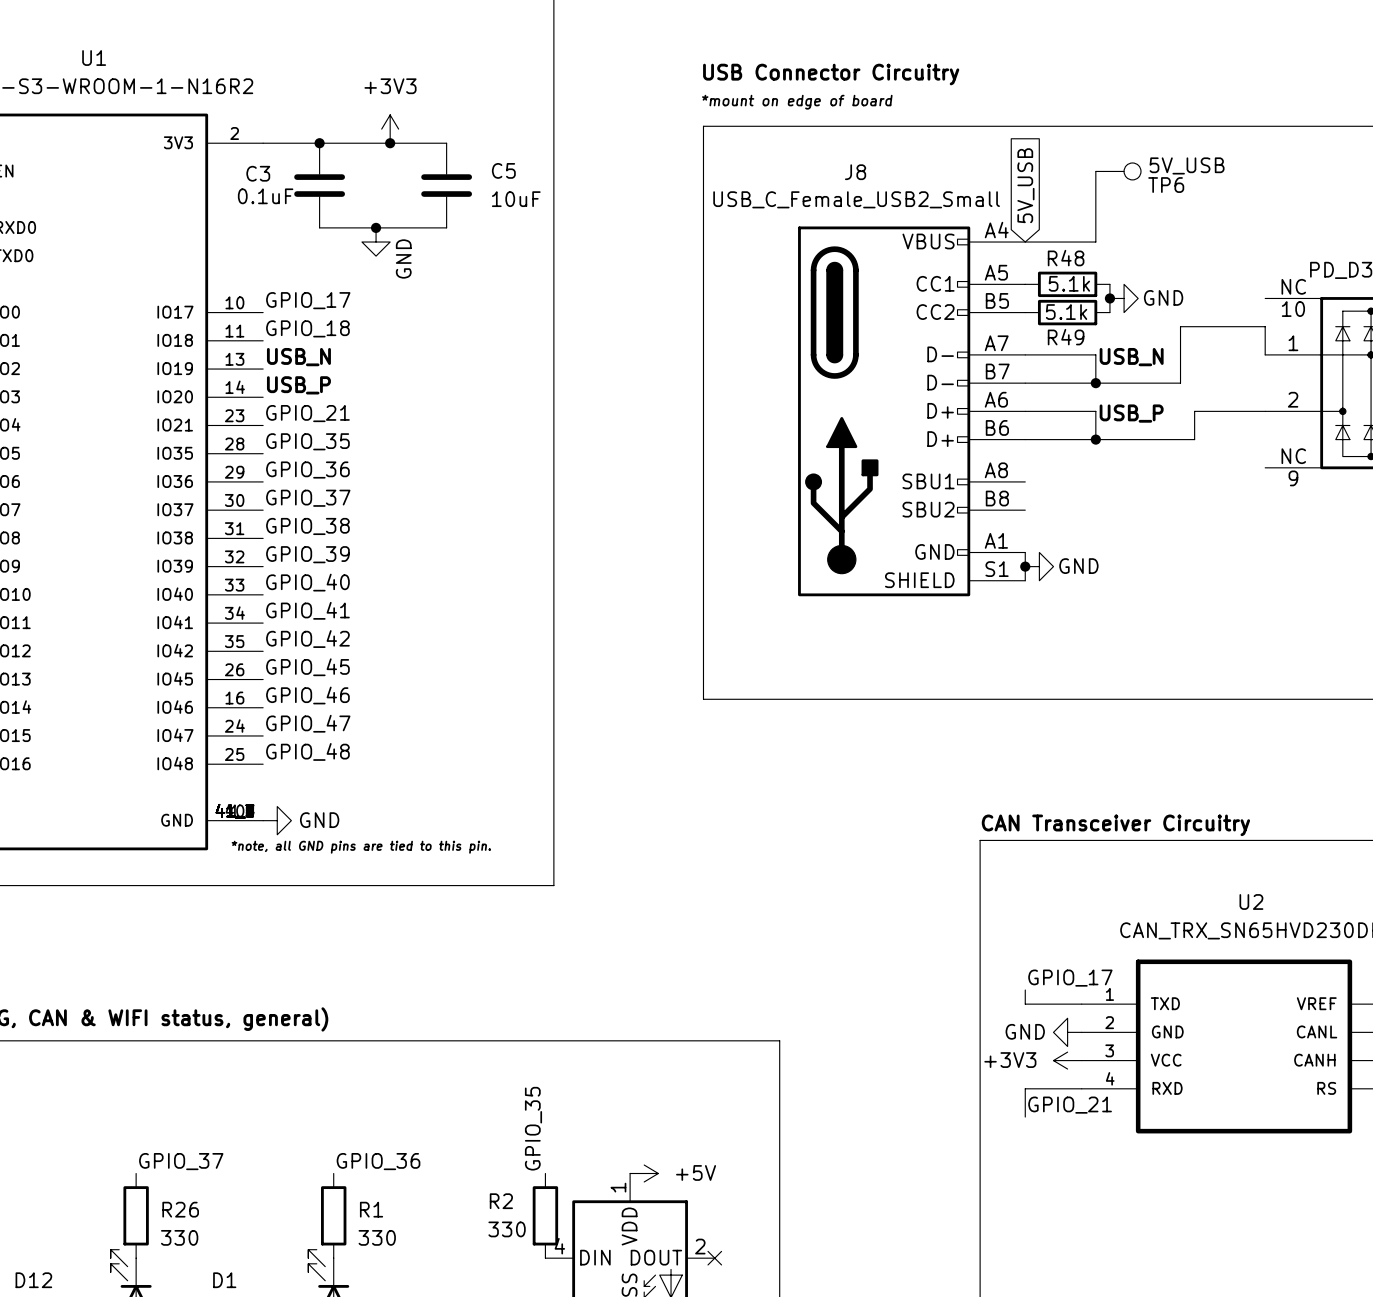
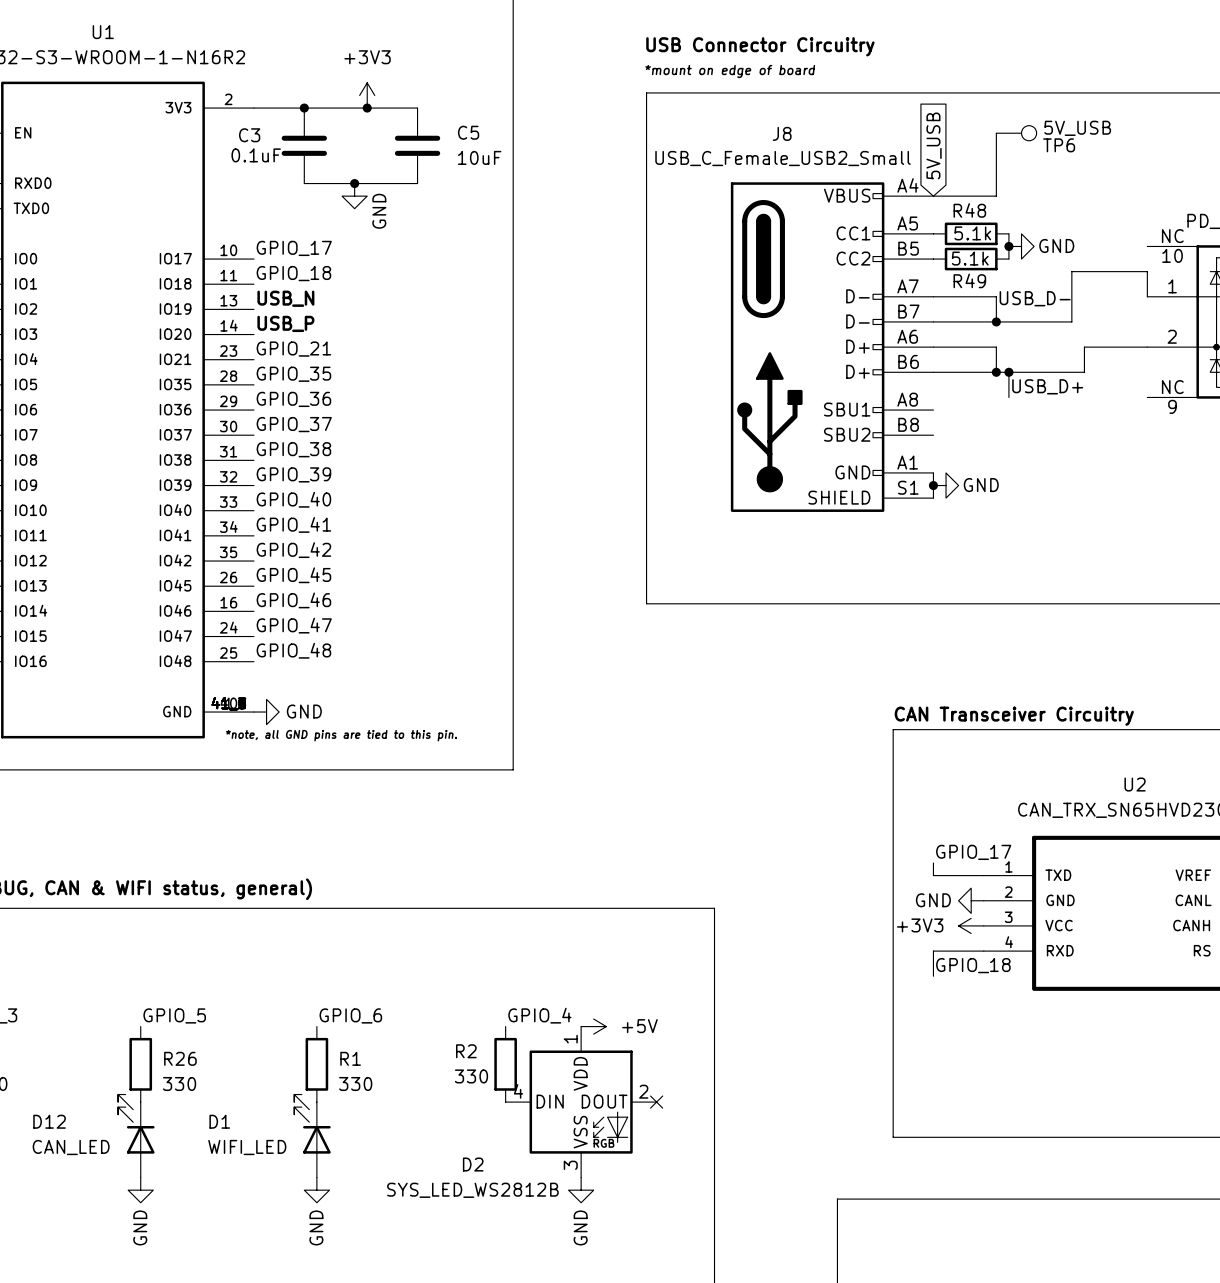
label: USB_N (1131, 357) -> USB_D- (1035, 298)
label: USB_P (1131, 413) -> none
wire: none -> (1008, 372) (1008, 397)
junction: none -> (1008, 372)
label: none -> USB_D+ (1047, 386)
label: GPIO_21 (1070, 1105) -> GPIO_18 (973, 965)
label: GPIO_35 (533, 1128) -> GPIO_4 (539, 1015)
label: GPIO_37 (181, 1161) -> GPIO_5 (174, 1015)
label: GPIO_36 (378, 1161) -> GPIO_6 (350, 1015)

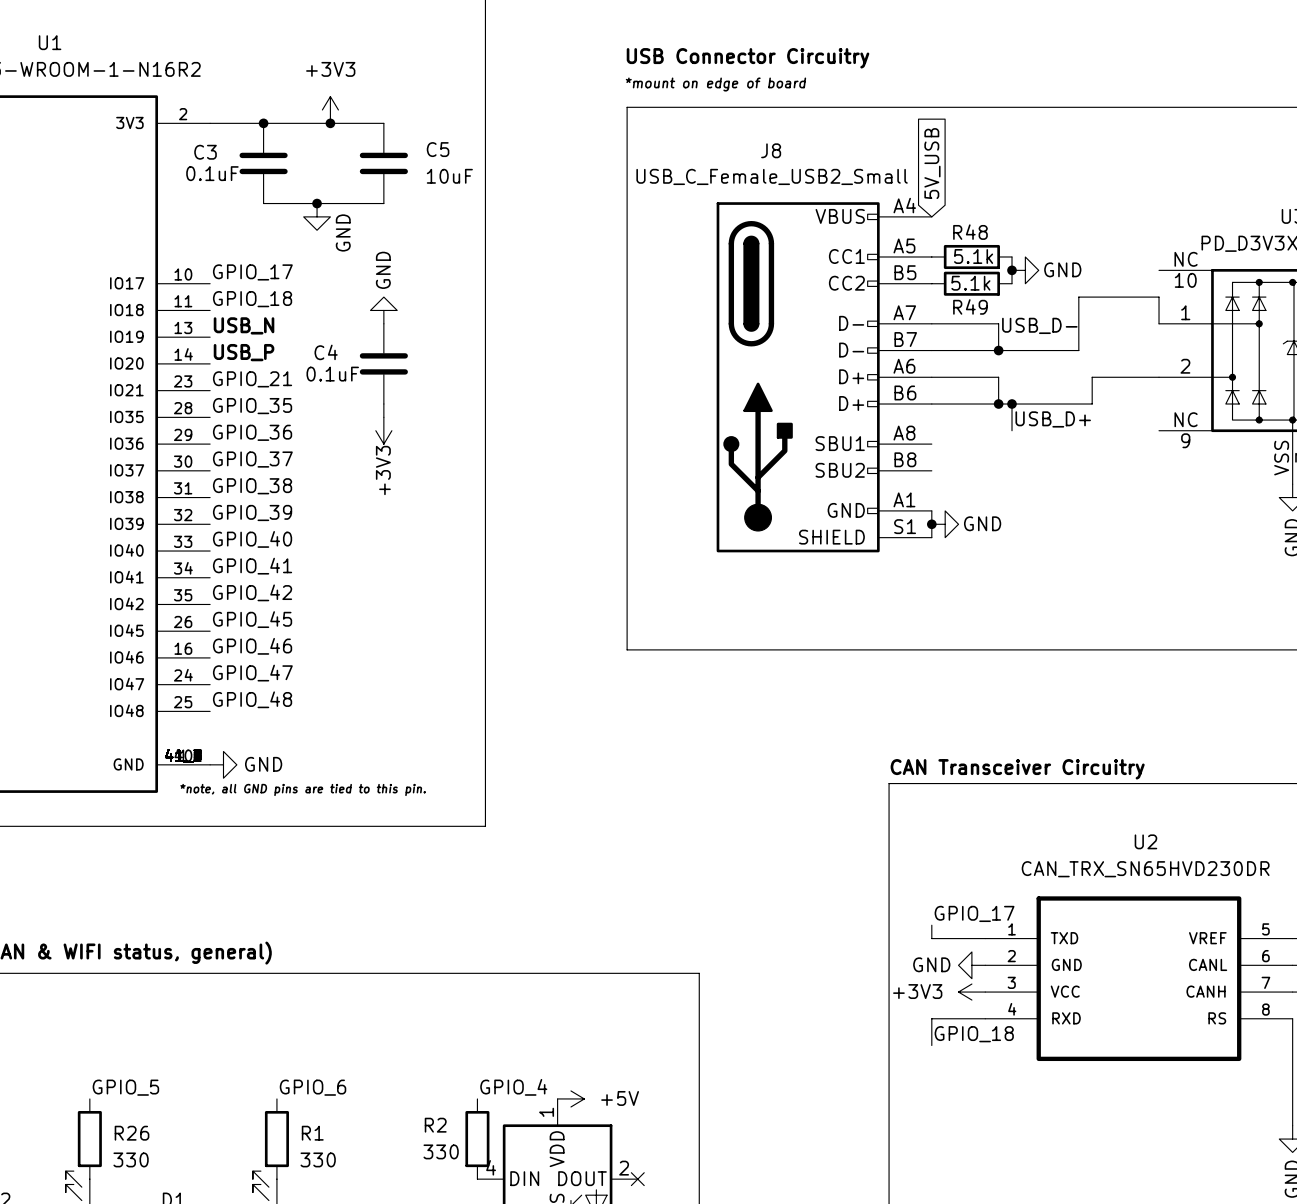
wire: (996, 133) (996, 196) (933, 196) -> none
TP6: 5V_USB (1016, 133) -> none
power symbol: none -> GND (383, 310)
C4: none -> 0.1uF (383, 363)
wire: none -> (383, 404) (383, 417)
power symbol: none -> +3V3 (383, 430)

